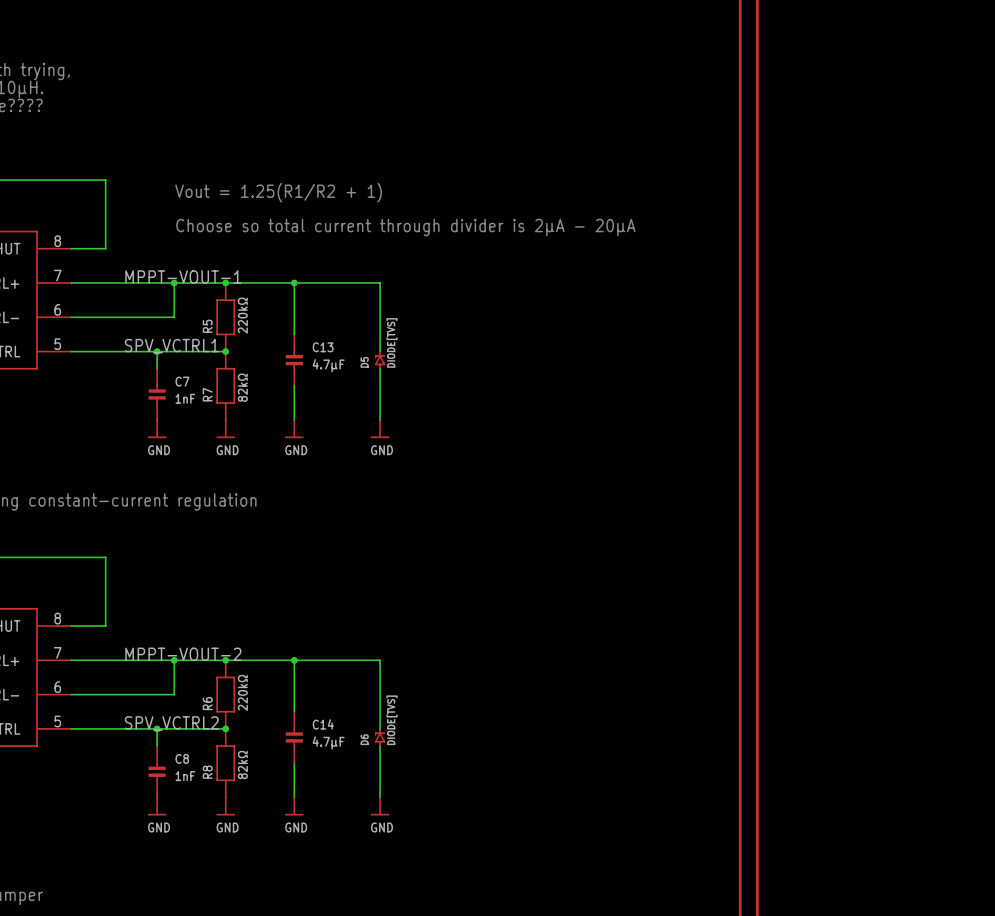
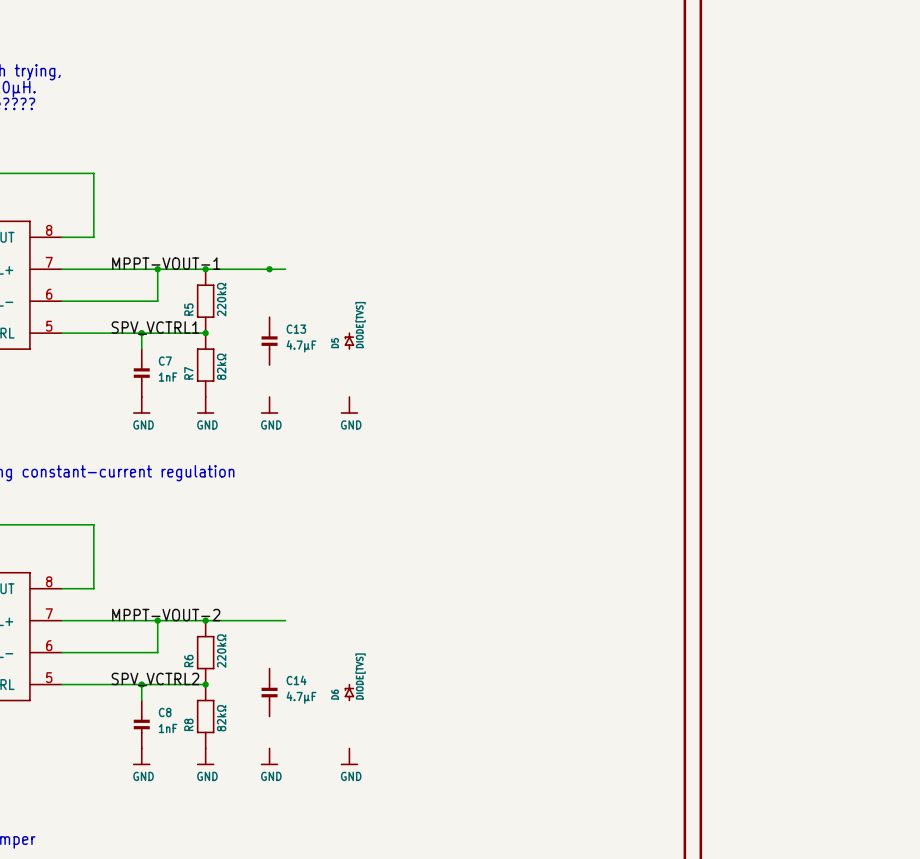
text: Vout = 1.25(R1/R2 + 1) (278, 192) -> none
text: Choose so total current through divider is 2µA - 20µA (405, 227) -> none
wire: (294, 282) (294, 334) -> none
wire: (311, 282) (380, 282) (380, 351) -> none
wire: (380, 368) (380, 420) -> none
wire: (294, 385) (294, 420) -> none
wire: (294, 660) (294, 711) -> none
junction: (294, 660) -> none
wire: (311, 660) (380, 660) (380, 728) -> none
wire: (380, 746) (380, 797) -> none
wire: (294, 763) (294, 797) -> none

